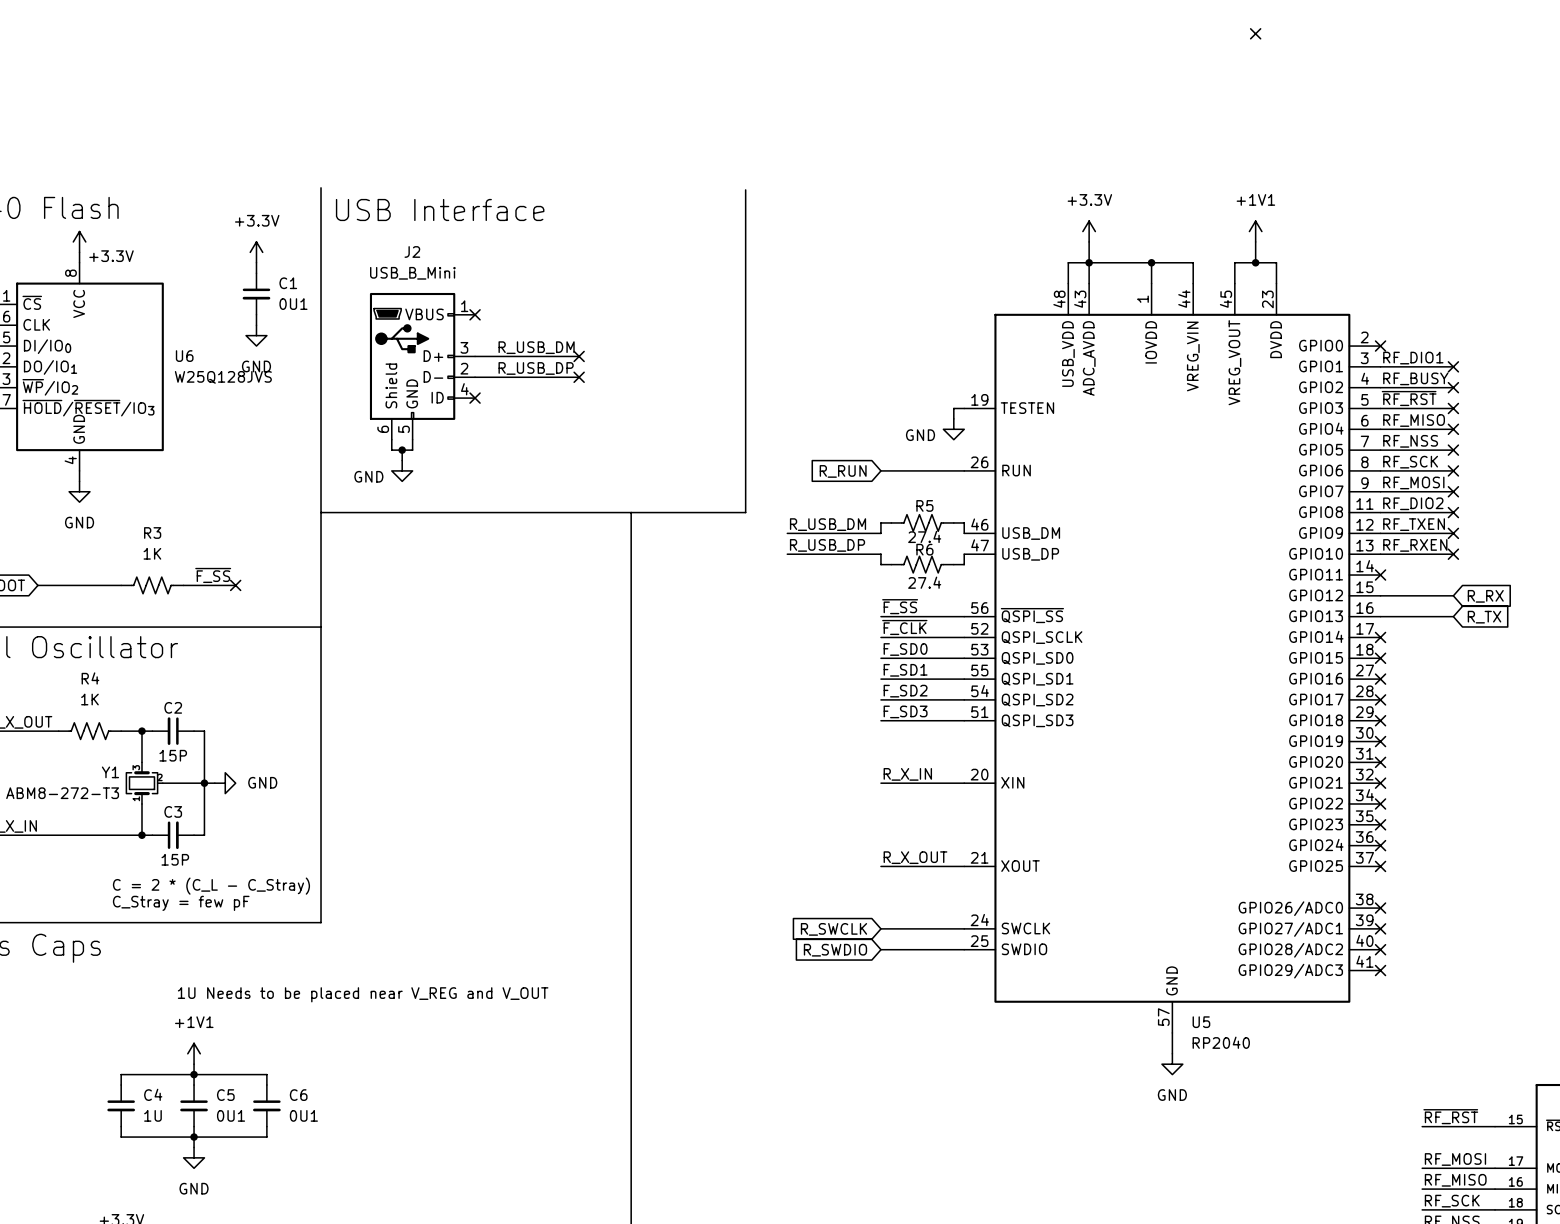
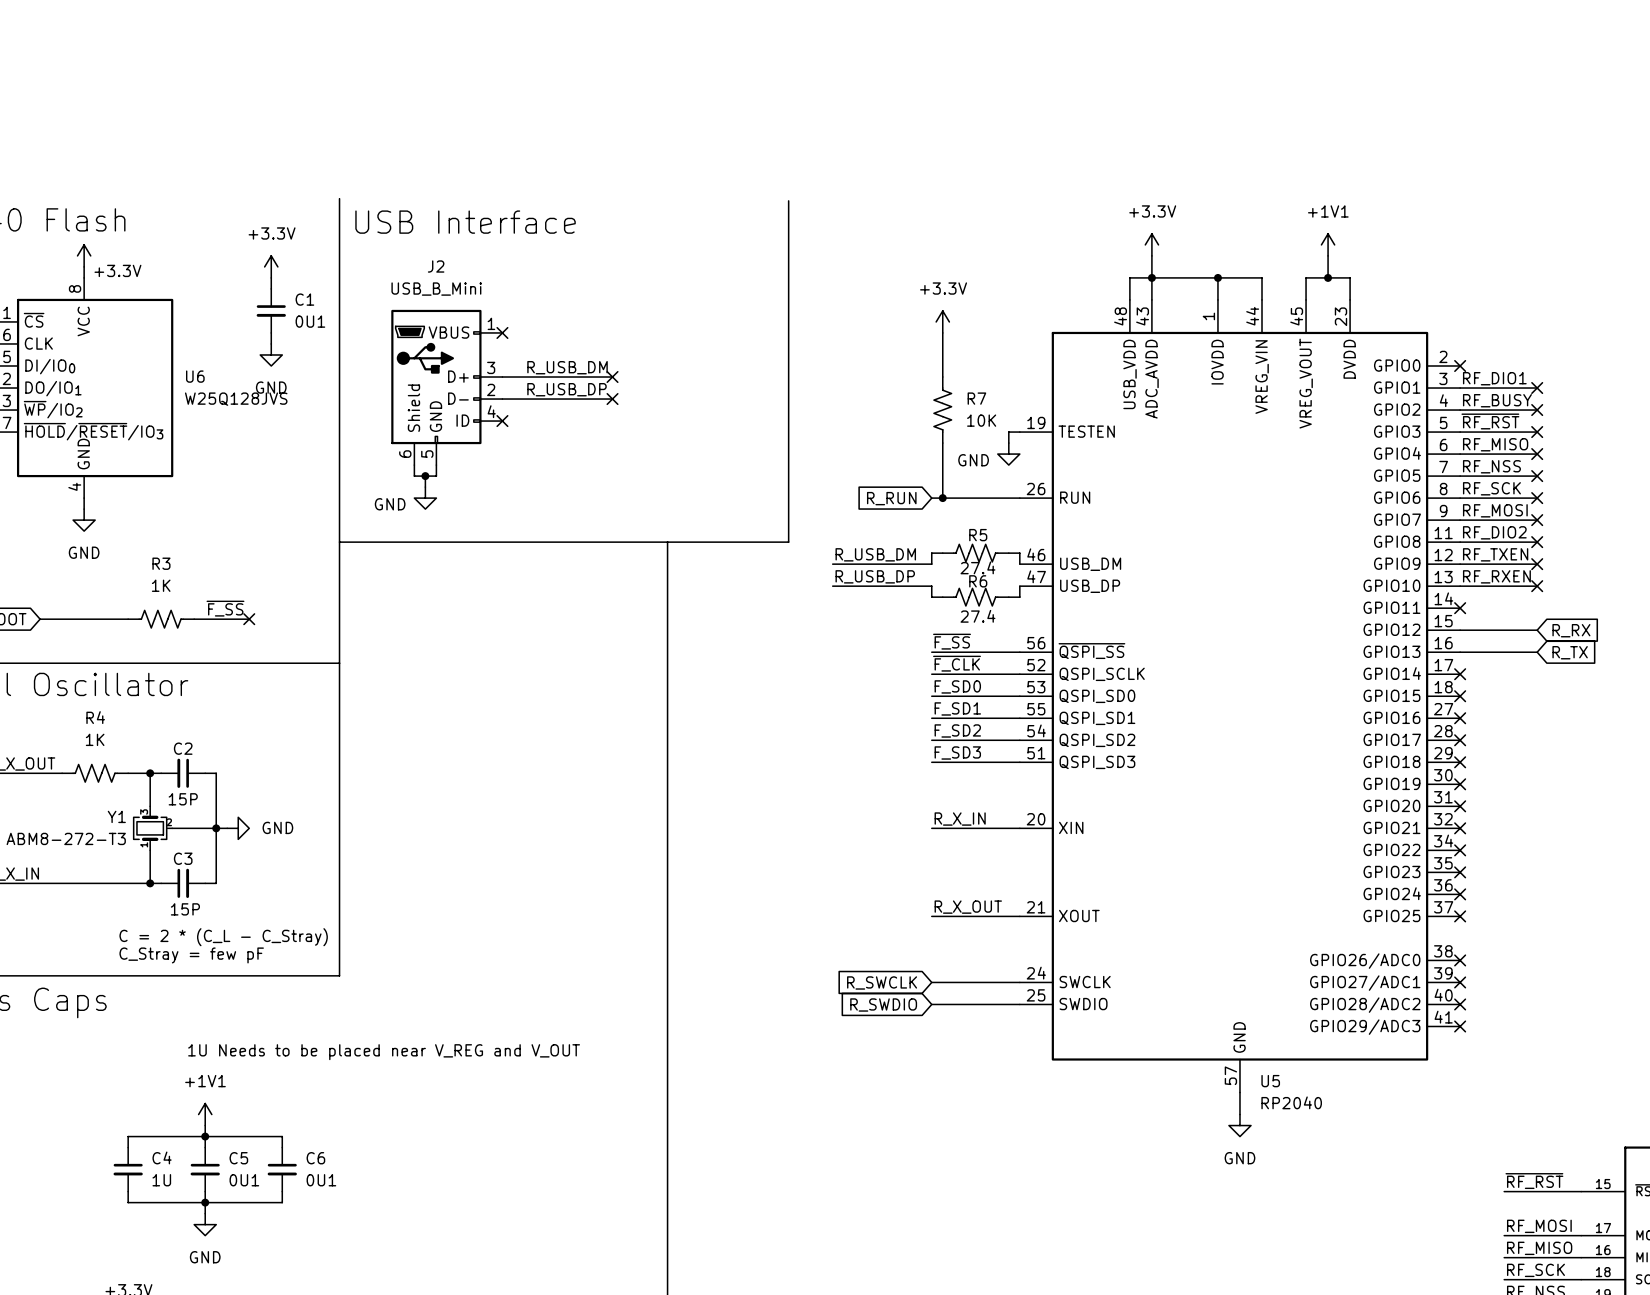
no-connect mark: (1255, 33) -> none
power symbol: none -> +3.3V (942, 321)
wire: none -> (942, 332) (942, 377)
R7: none -> 10K (942, 410)
wire: none -> (942, 443) (942, 498)
junction: none -> (942, 498)

